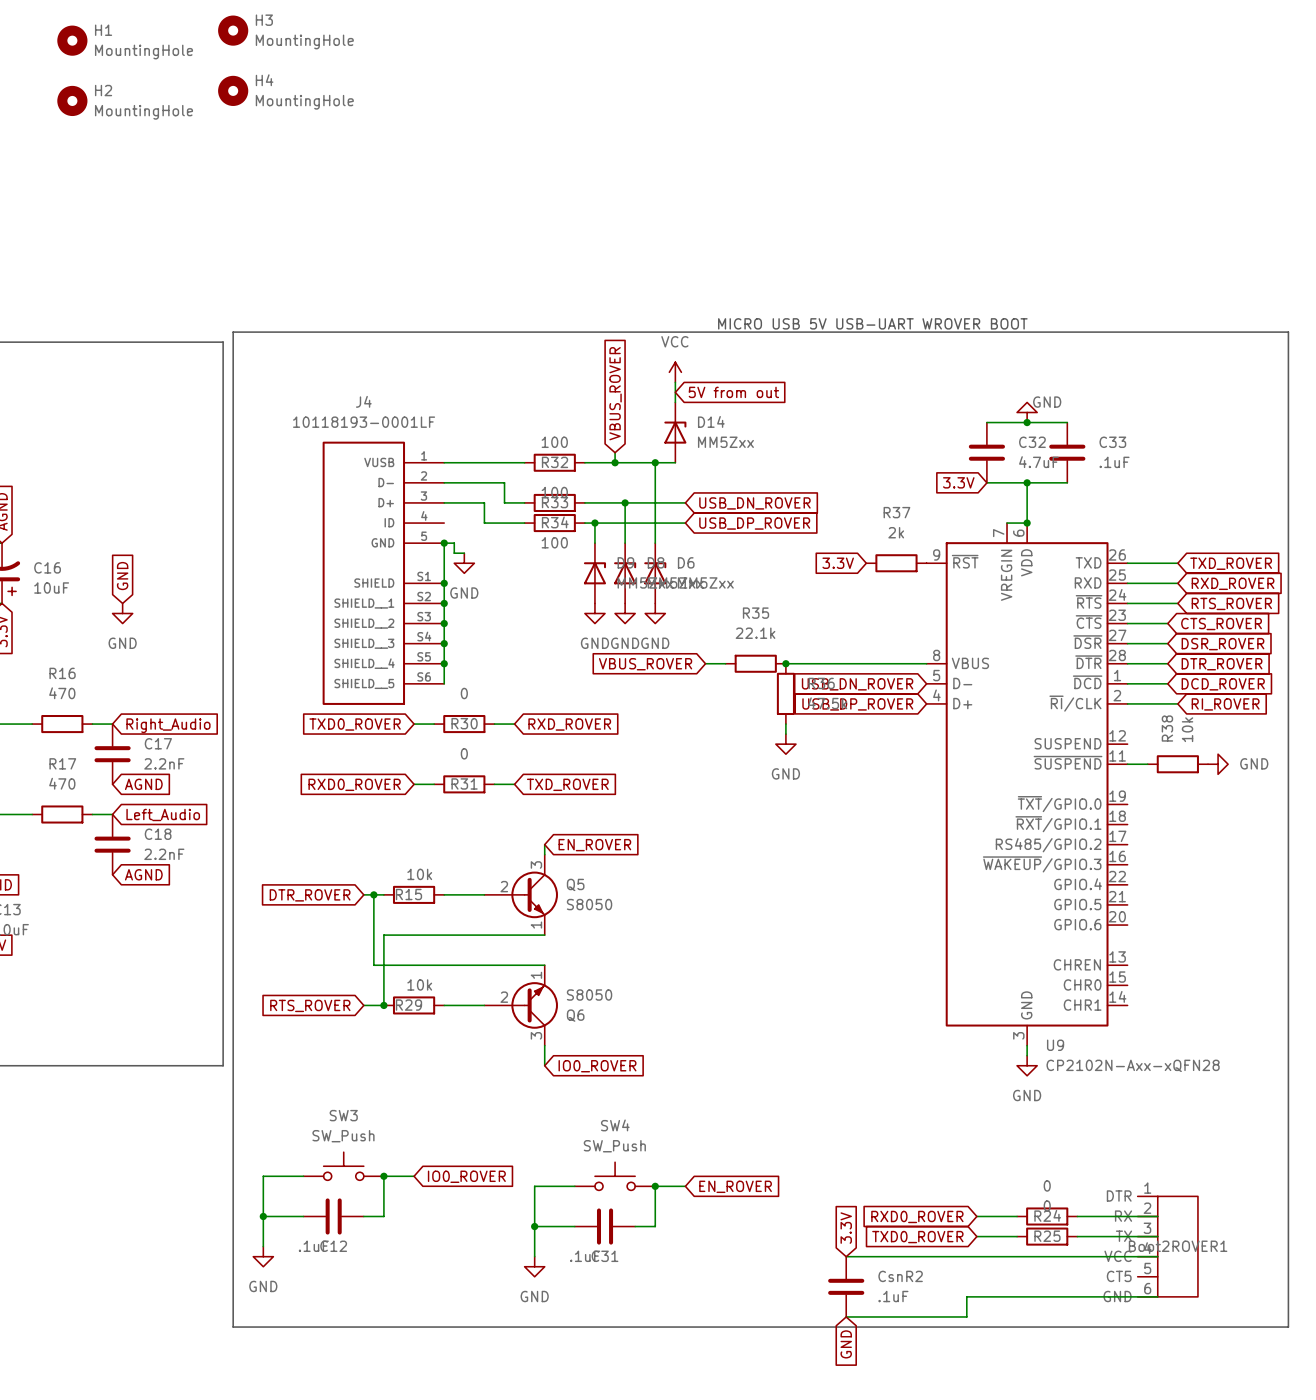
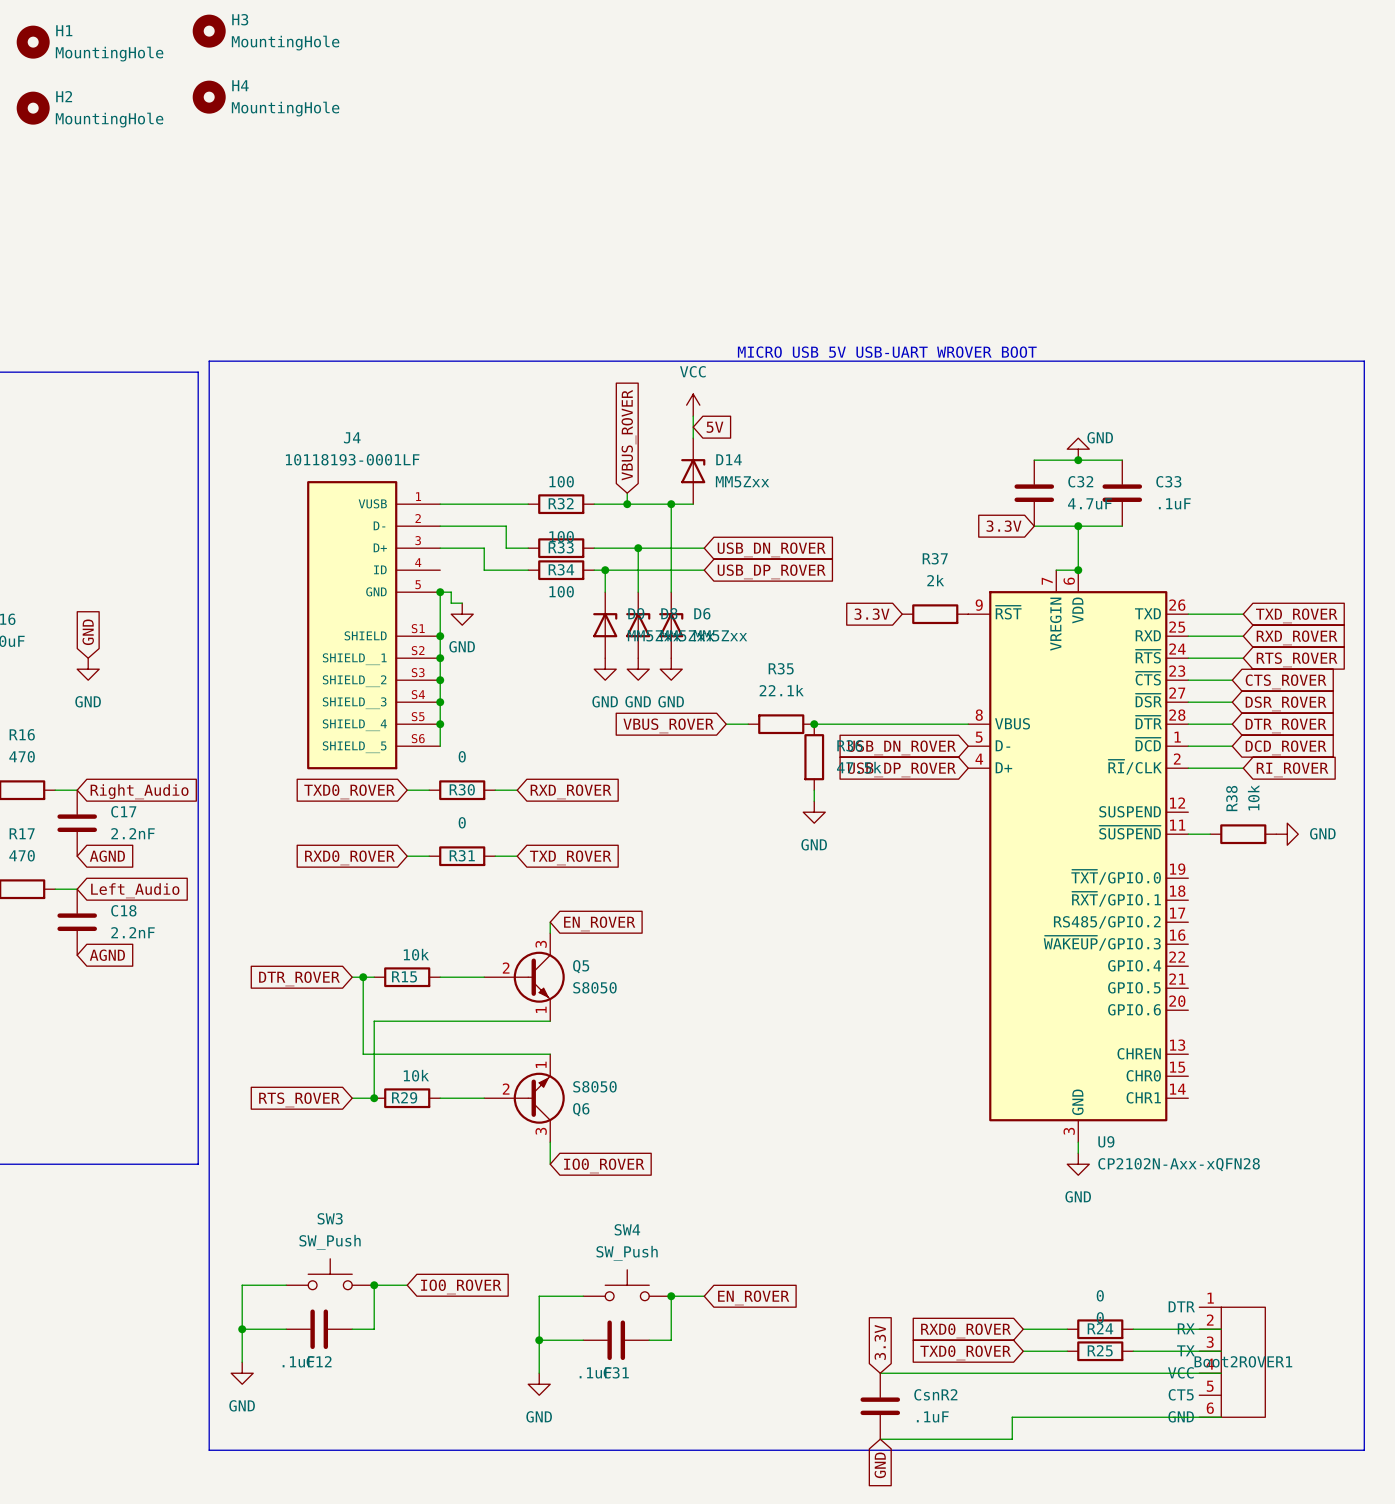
global label: 5V from out (733, 392) -> 5V (715, 427)

